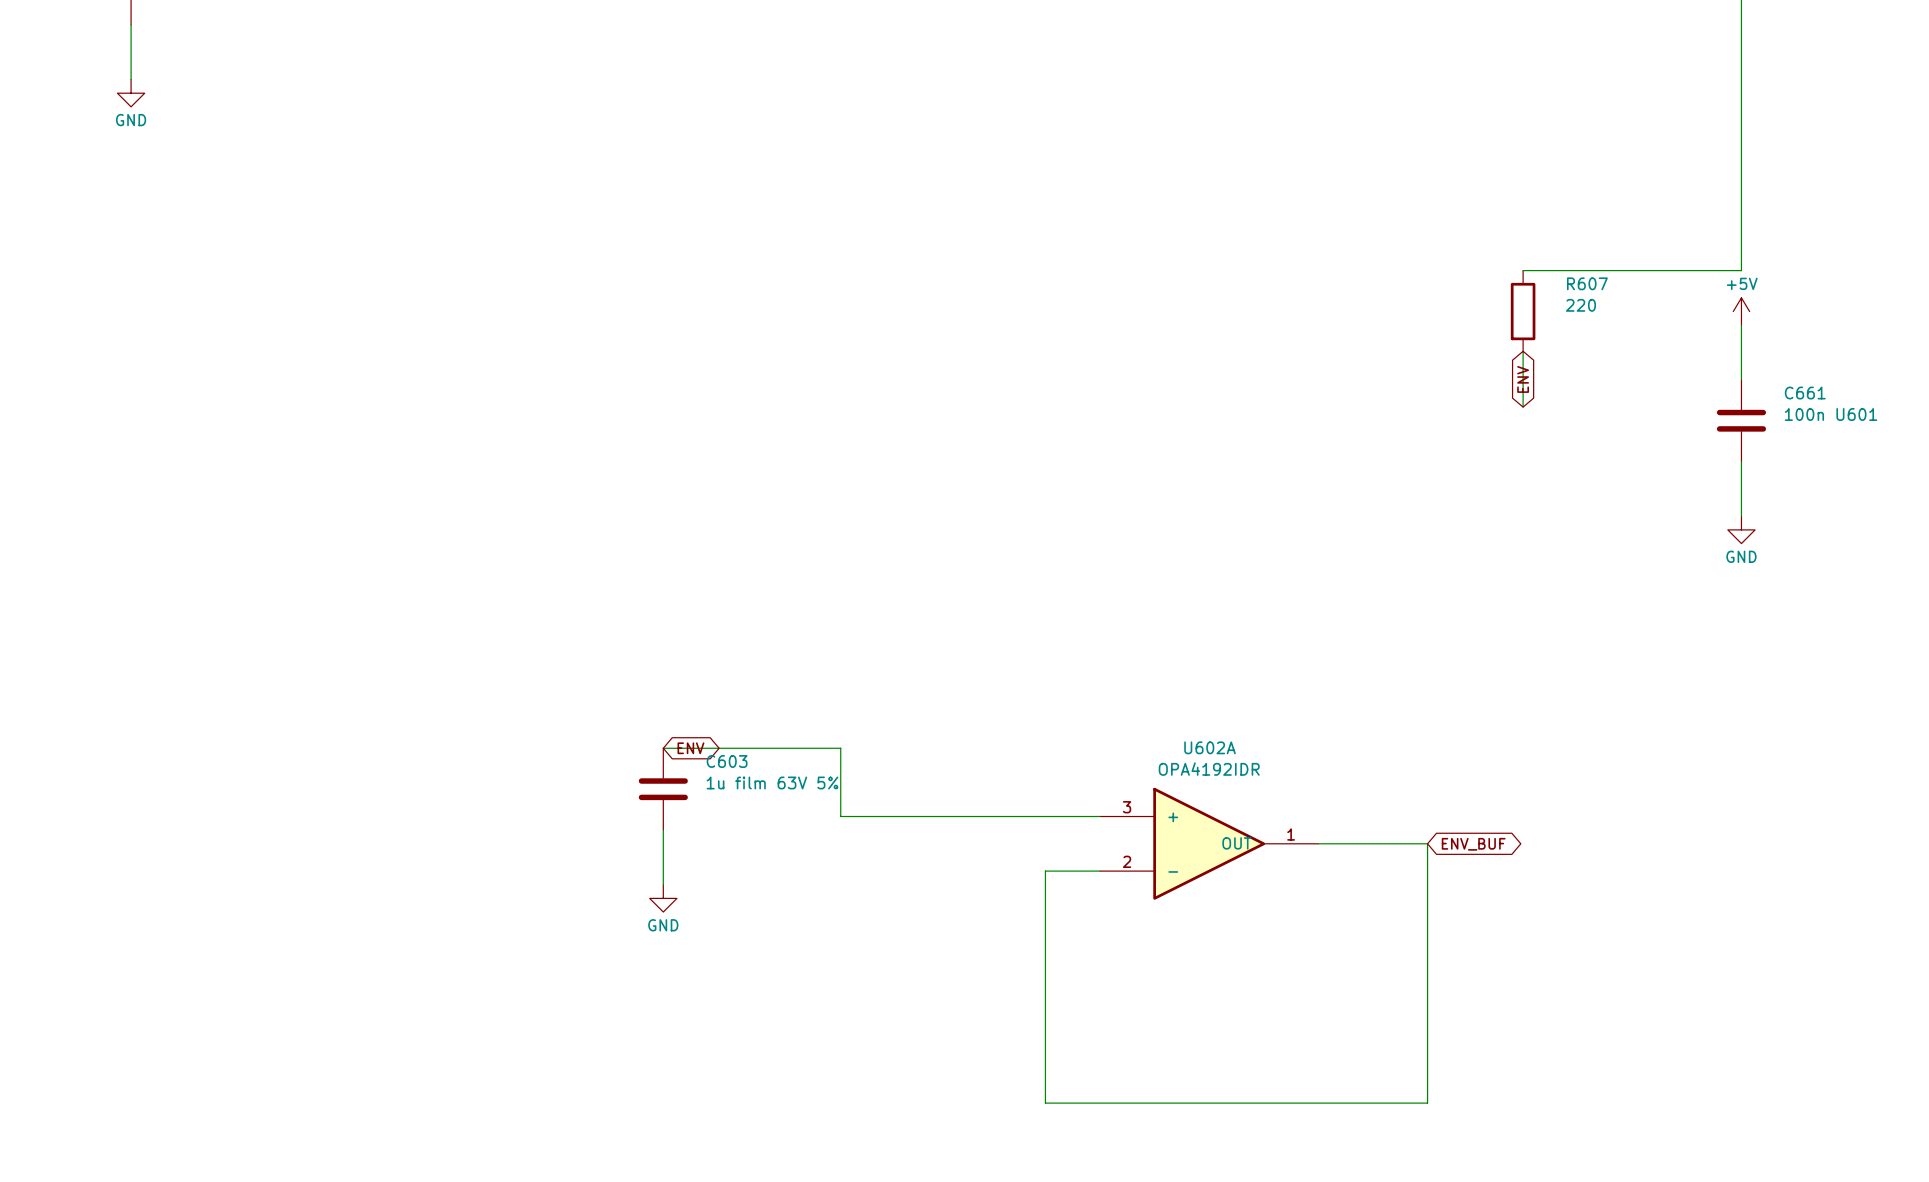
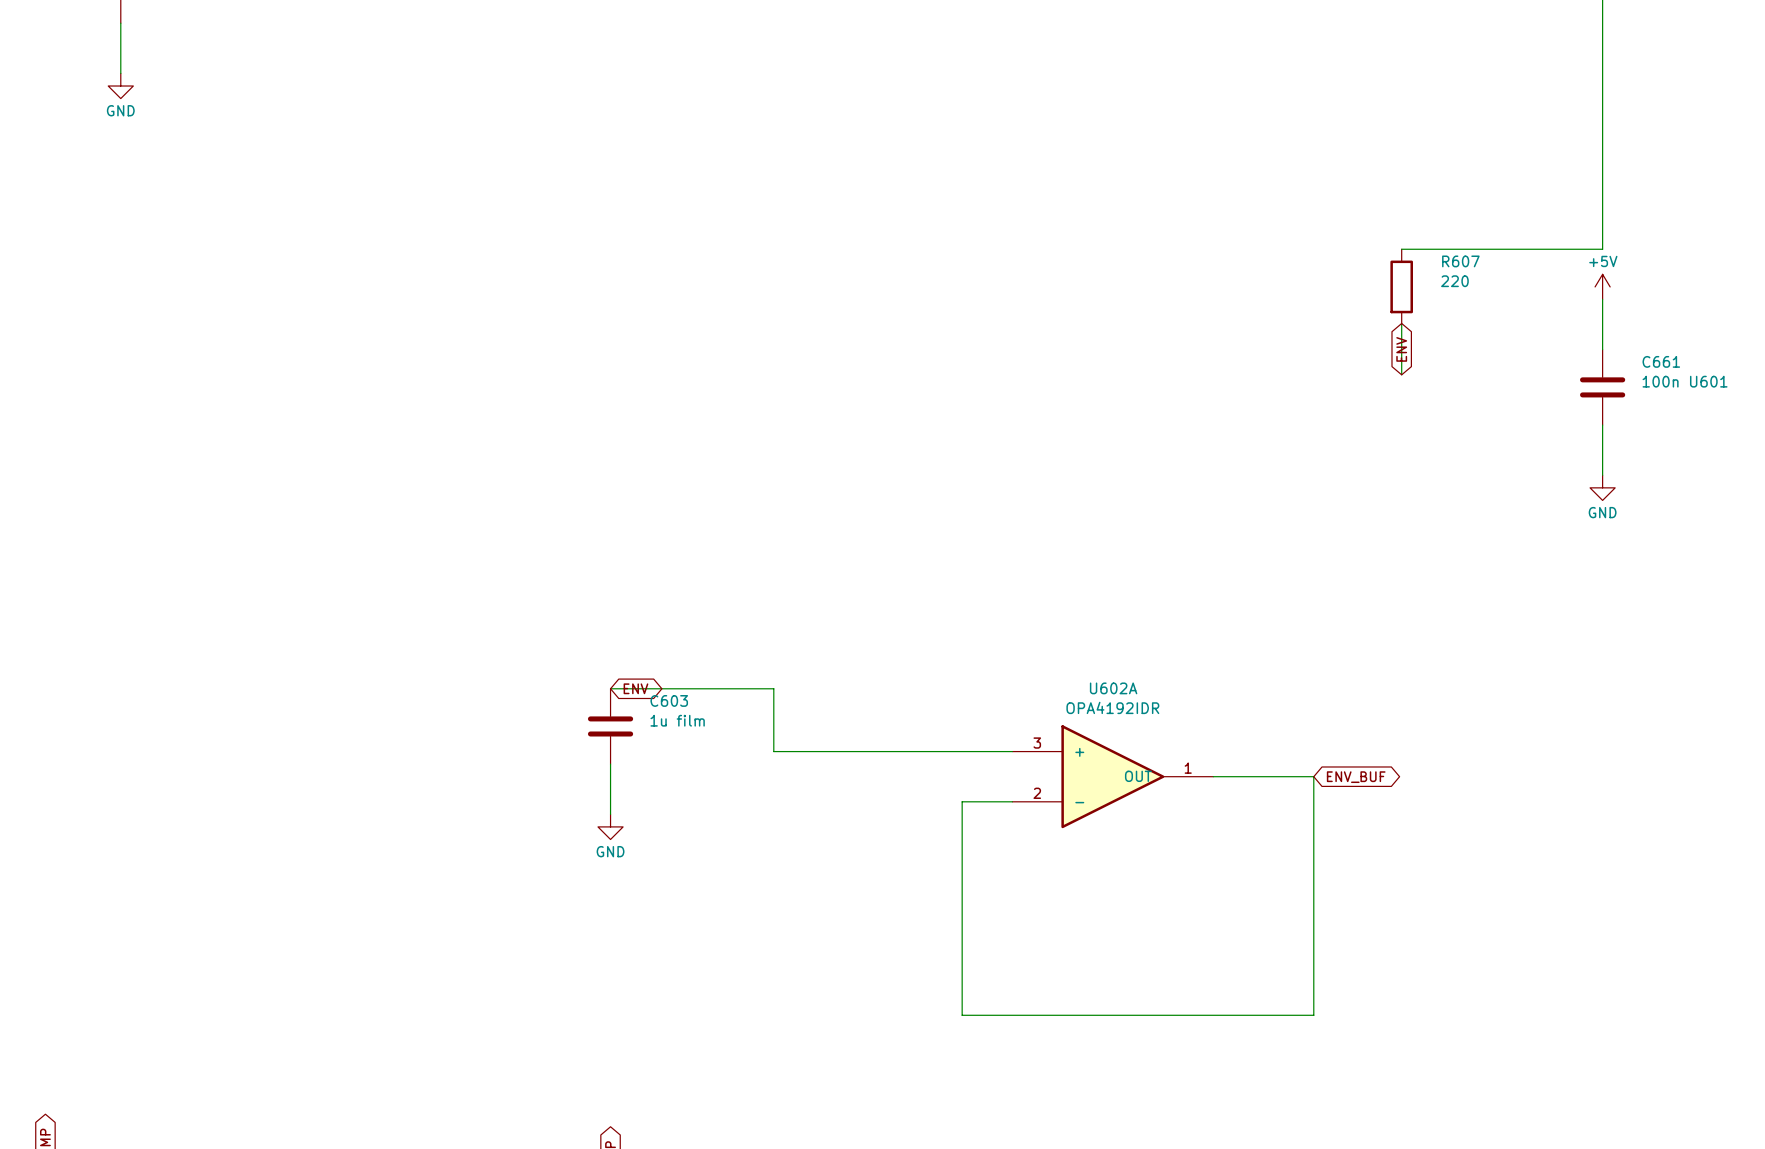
C603 value: 1u film 63V 5% (772, 782) -> 1u film (677, 720)

